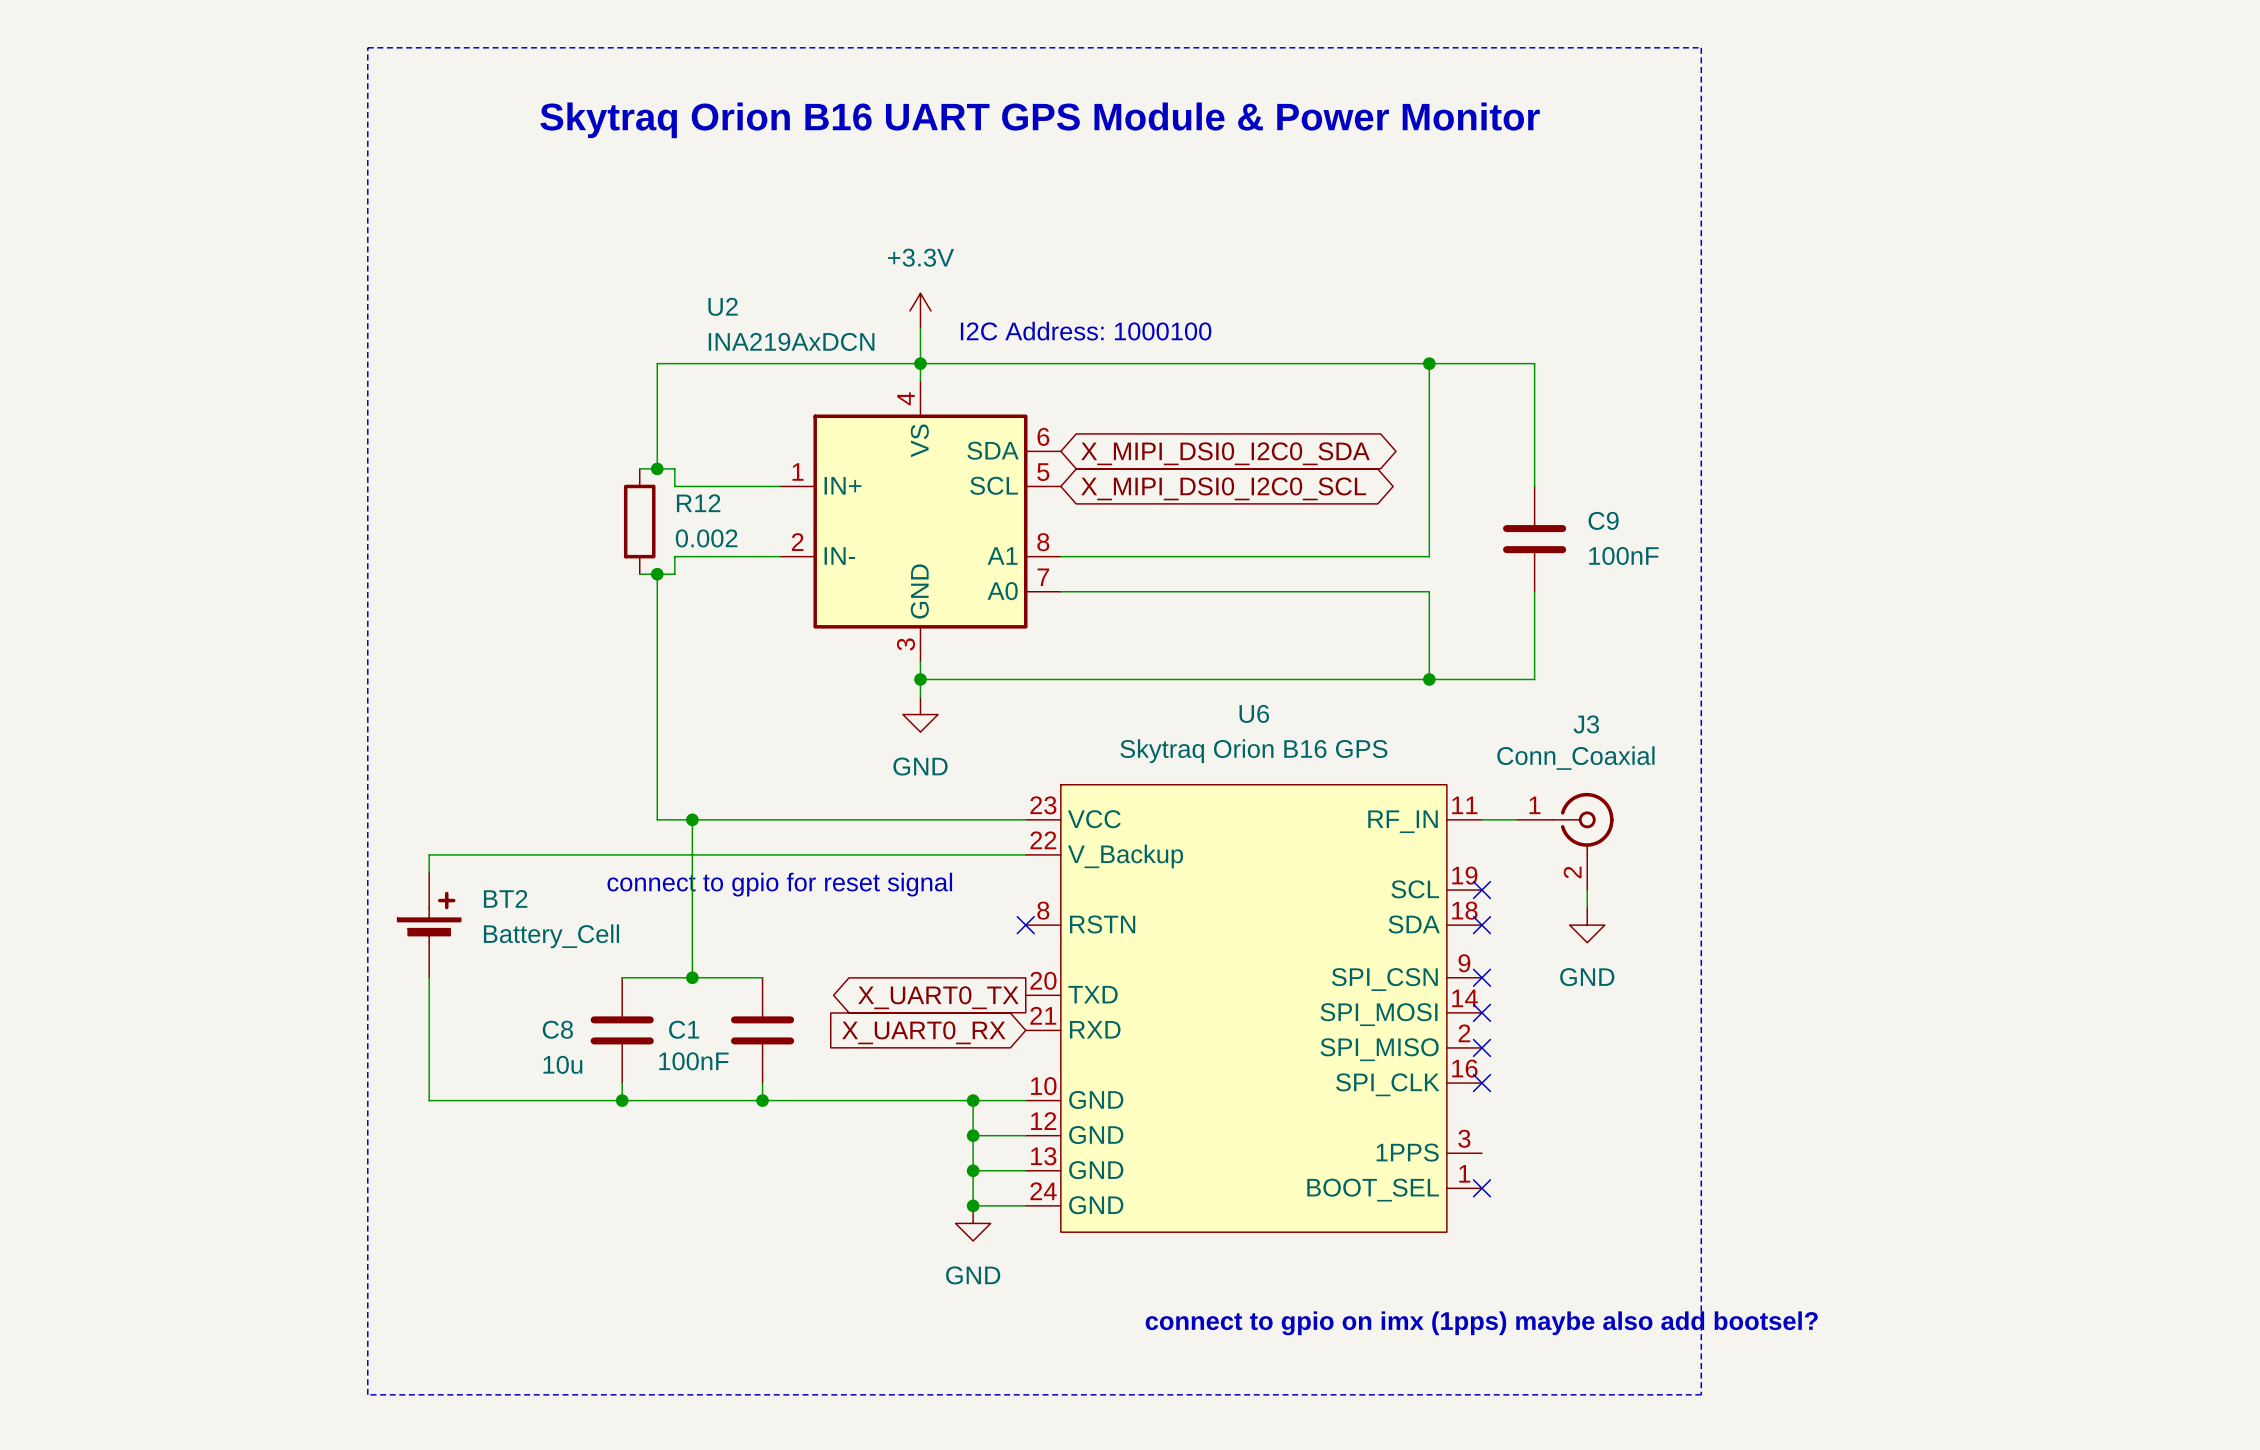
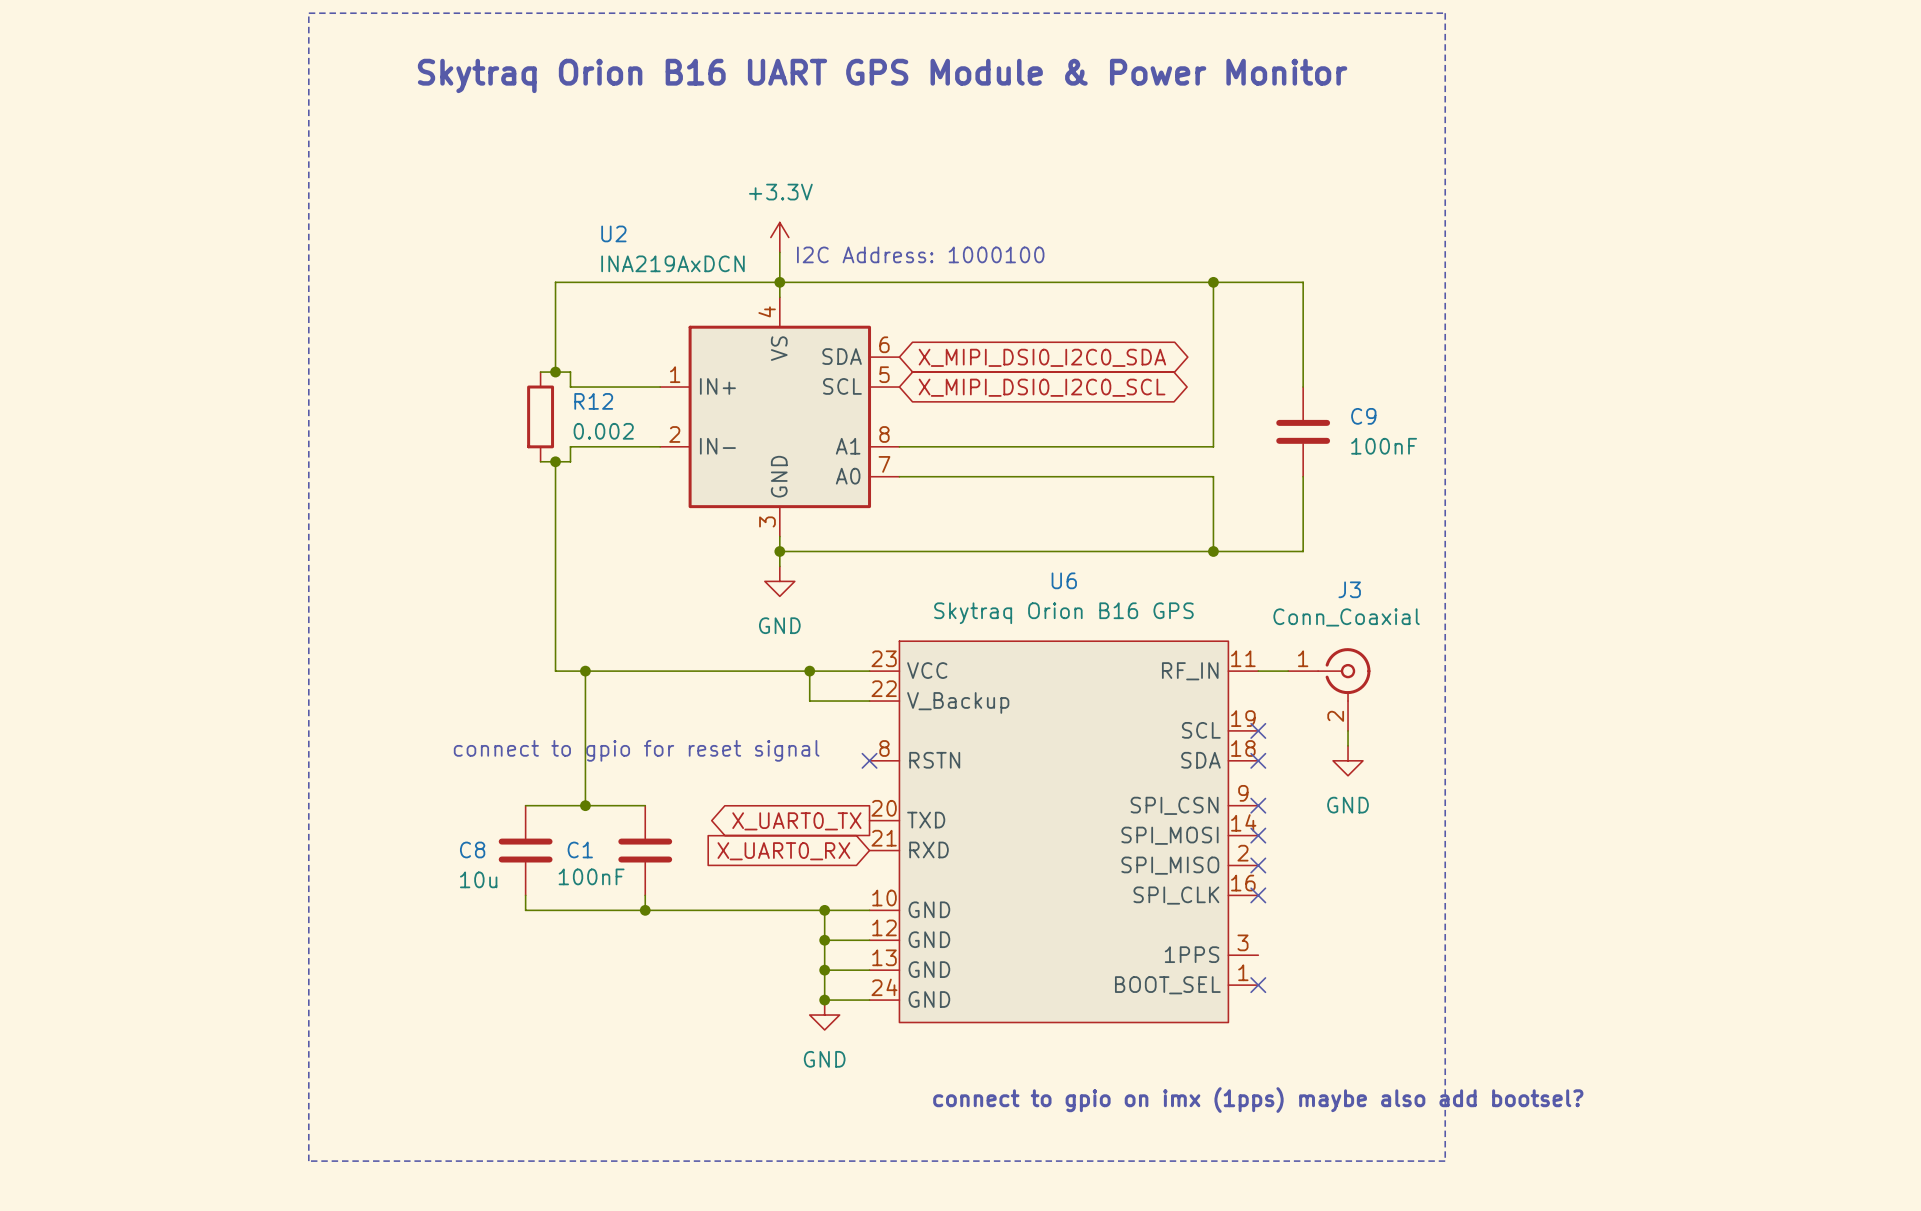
junction: none -> (809, 671)
wire: (955, 854) (429, 854) (429, 872) -> (809, 701) (809, 671)
text position: connect to gpio for reset signal (779, 884) -> connect to gpio for reset signal (636, 750)
BT2: Battery_Cell (429, 925) -> none
wire: (429, 977) (429, 1100) (622, 1100) -> none
junction: (622, 1100) -> none

